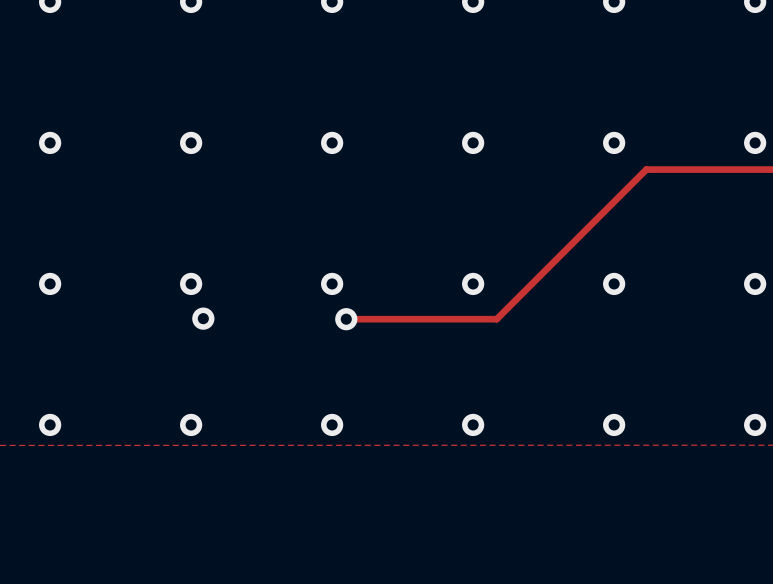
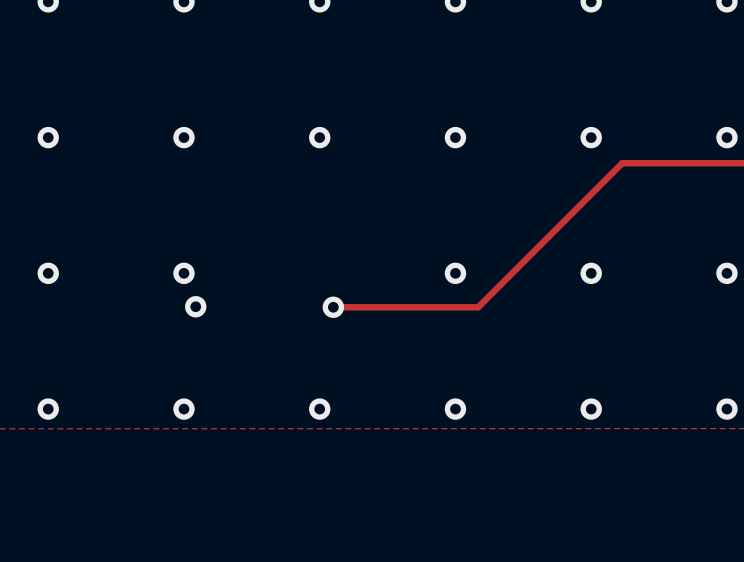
via: (332, 283) -> none

